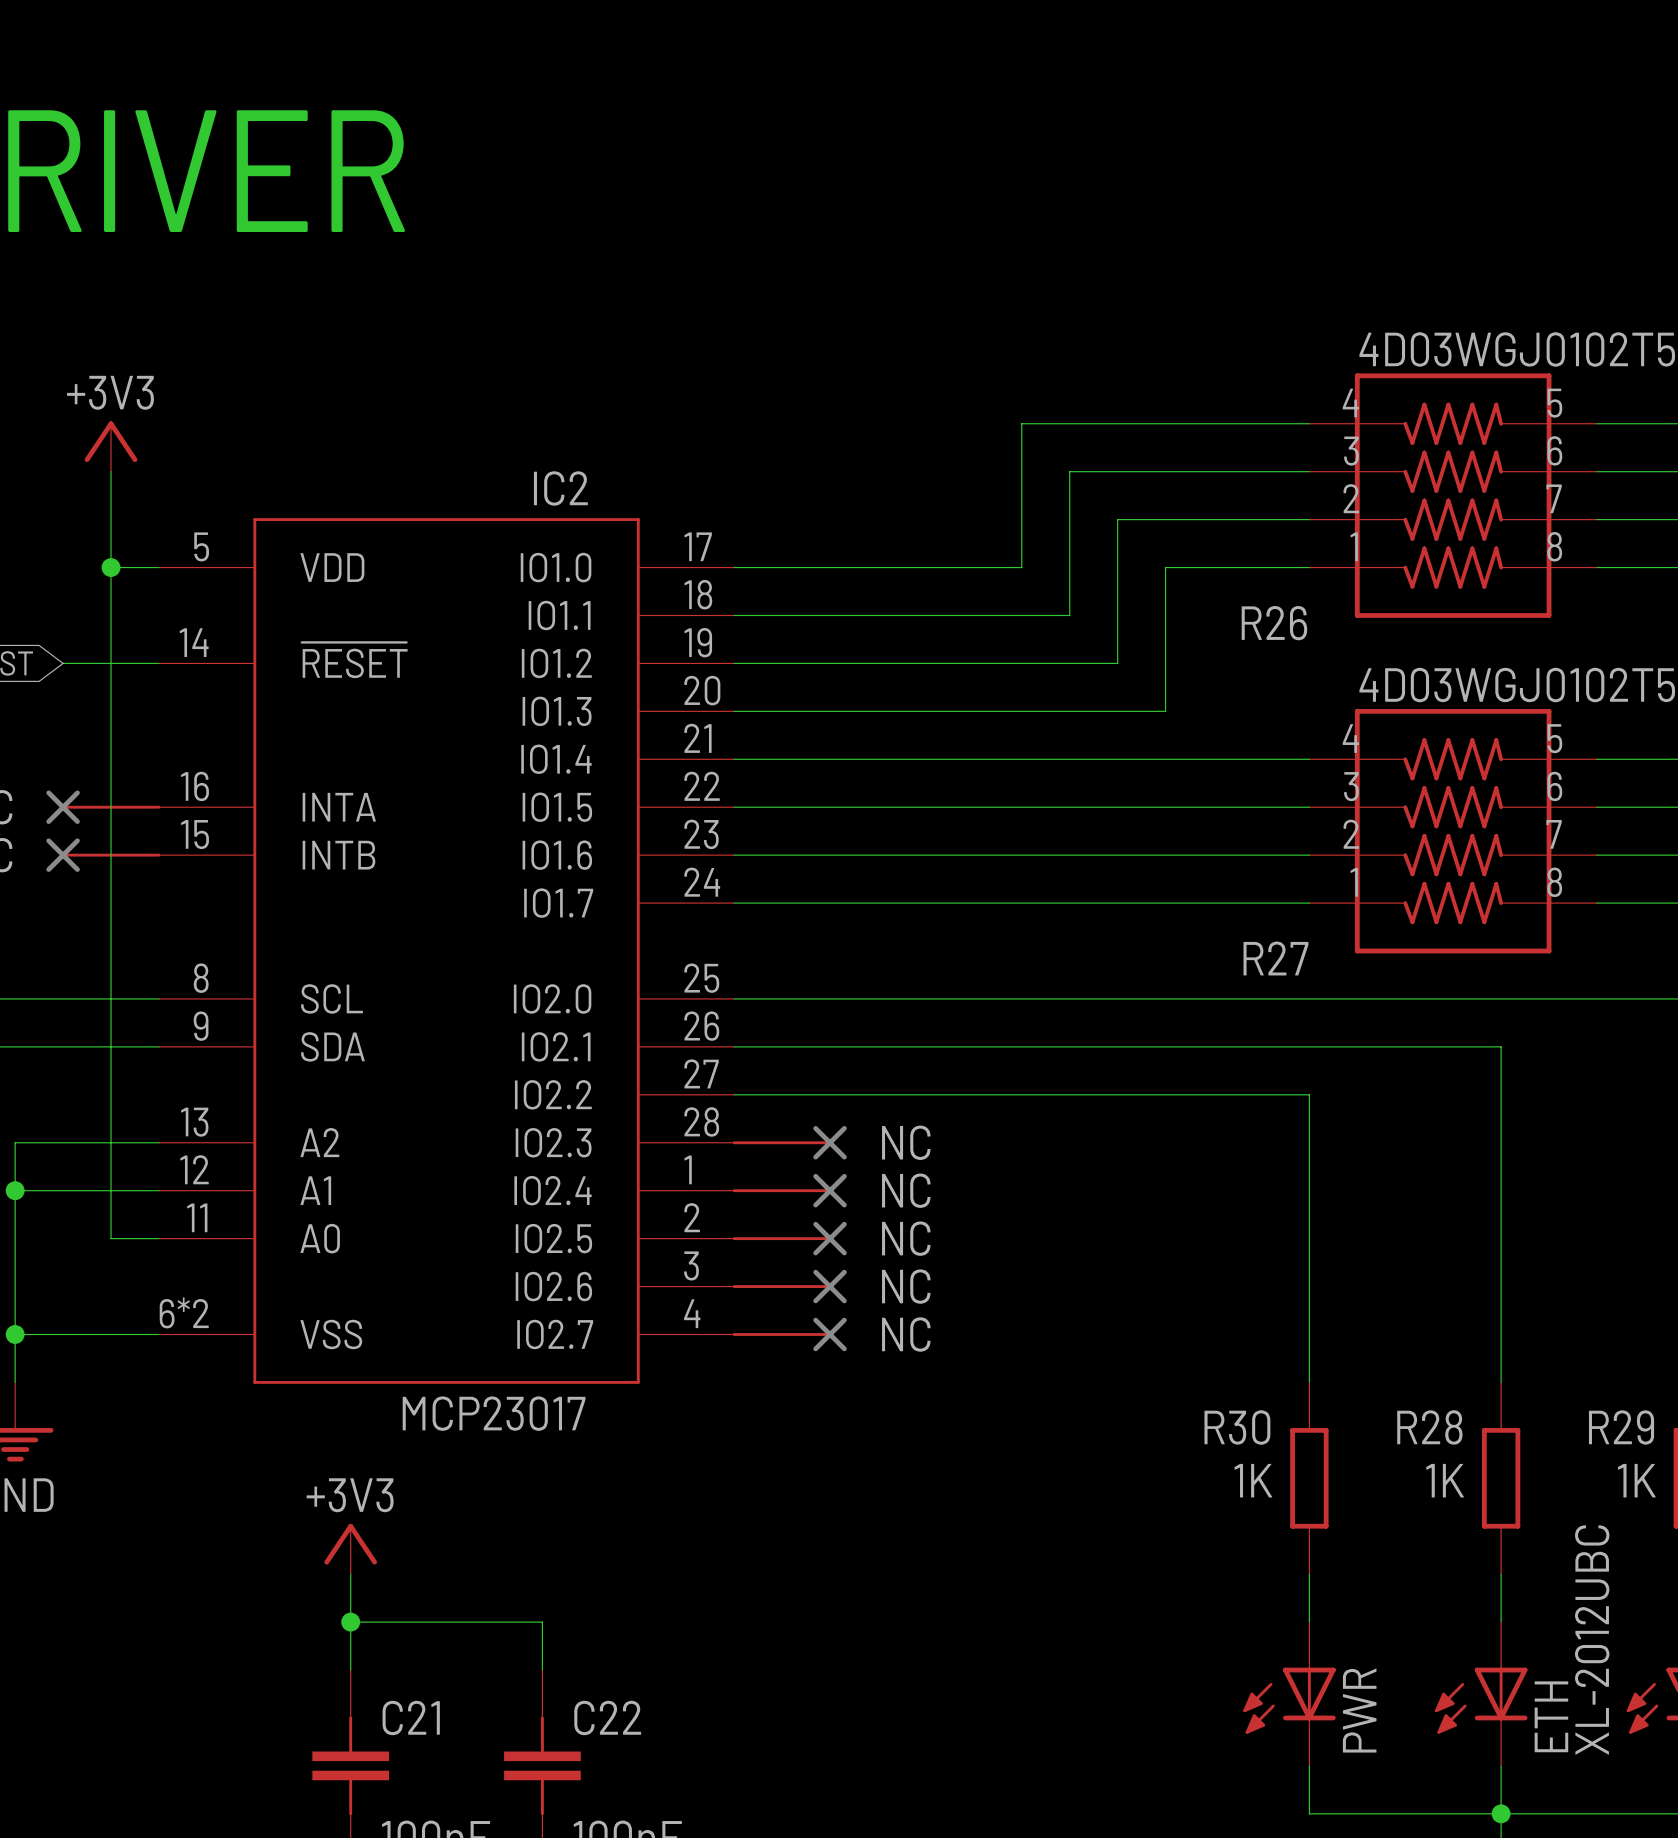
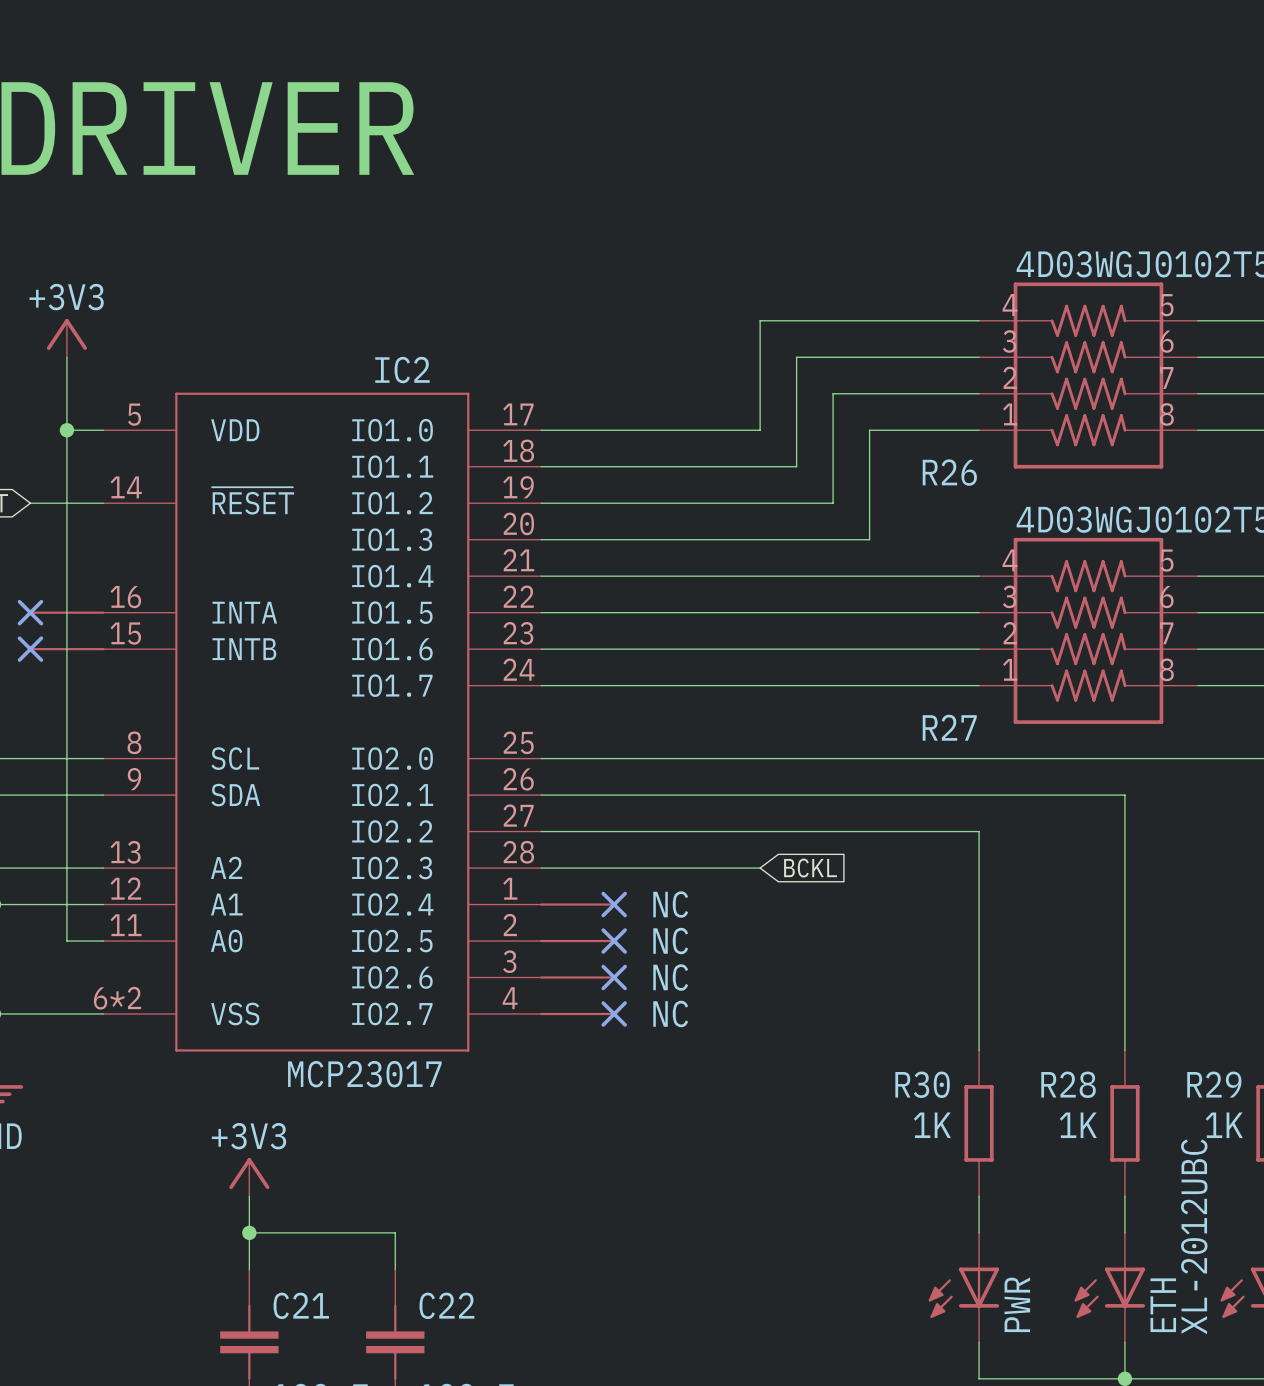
wire: none -> (541, 868) (760, 868)
part: (789, 1142) -> none
global label: none -> BCKL (810, 868)

